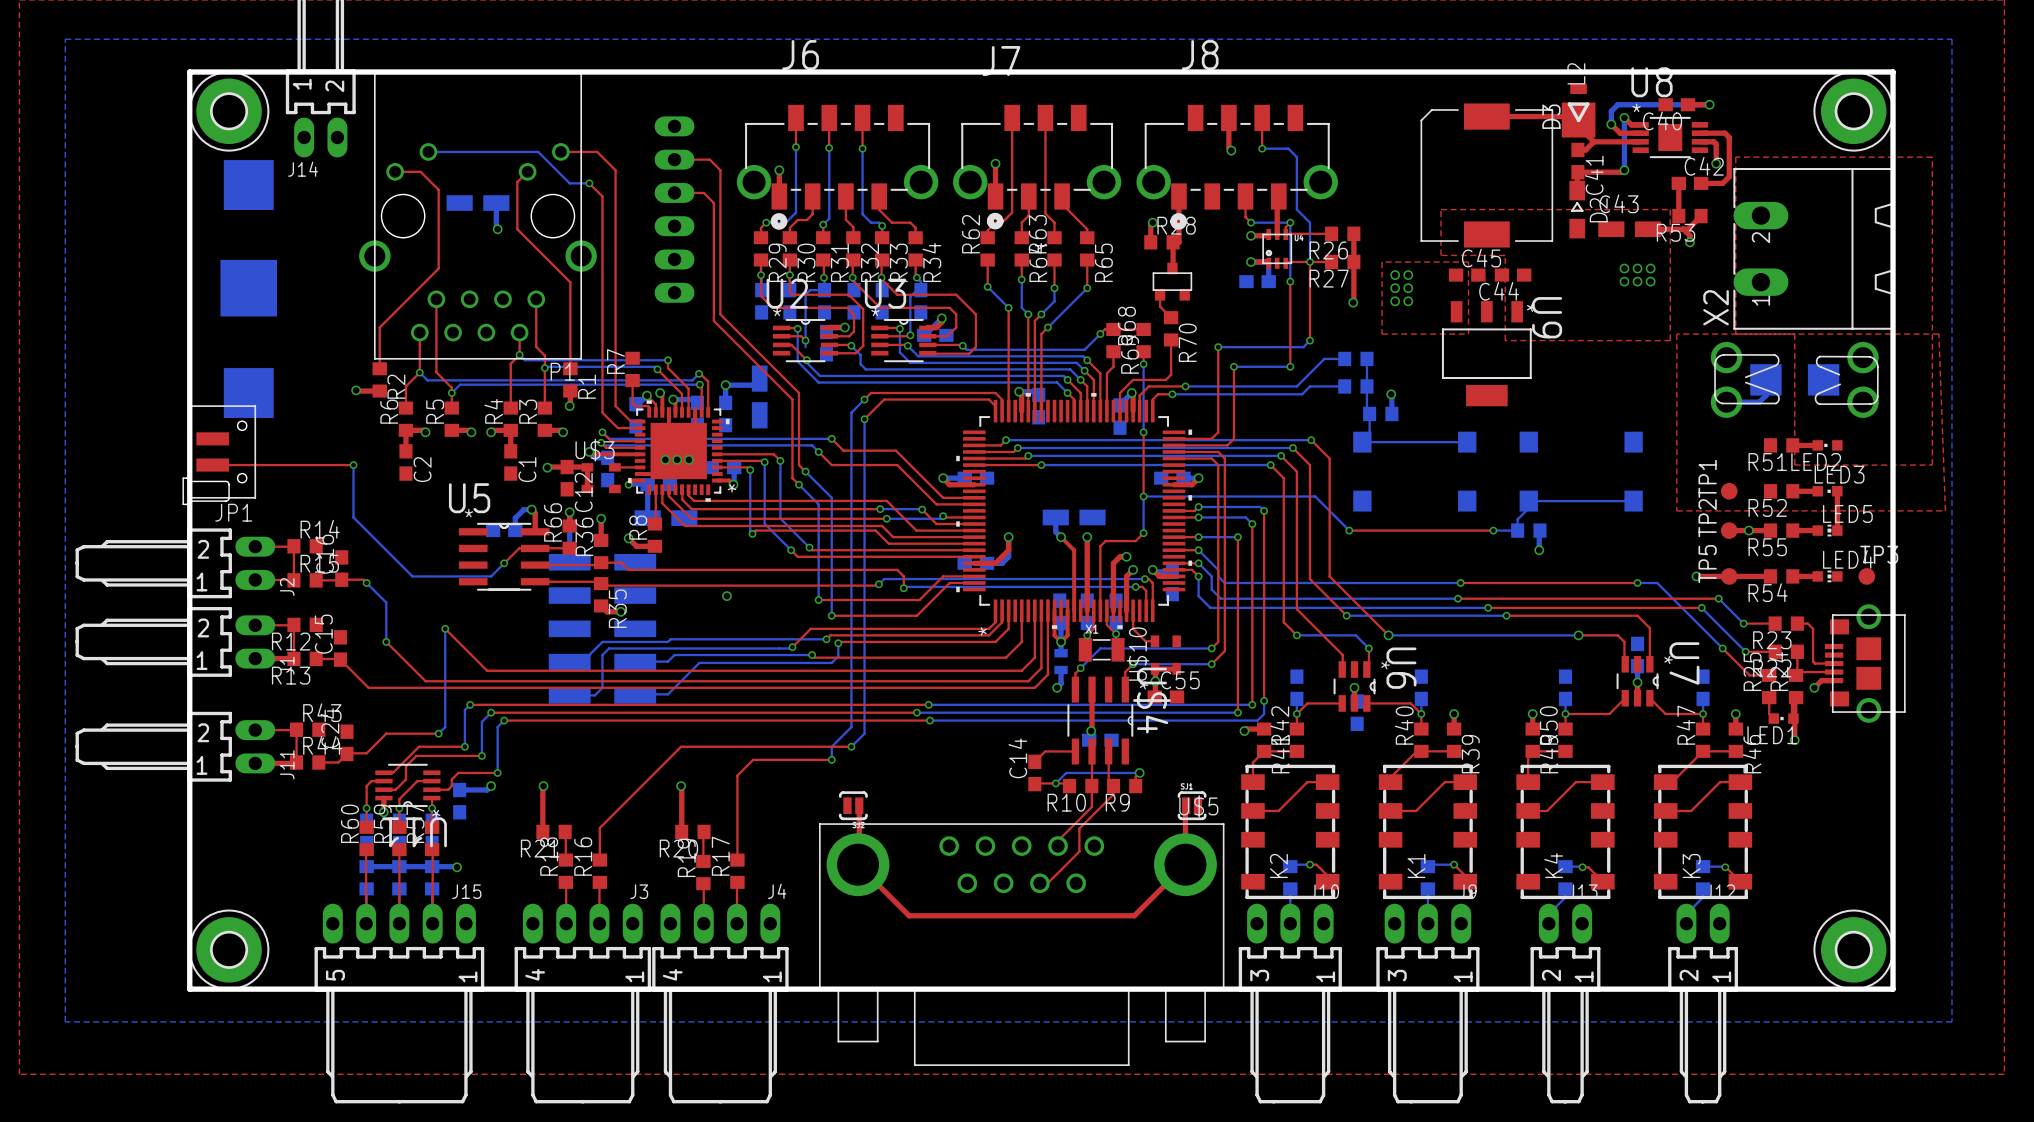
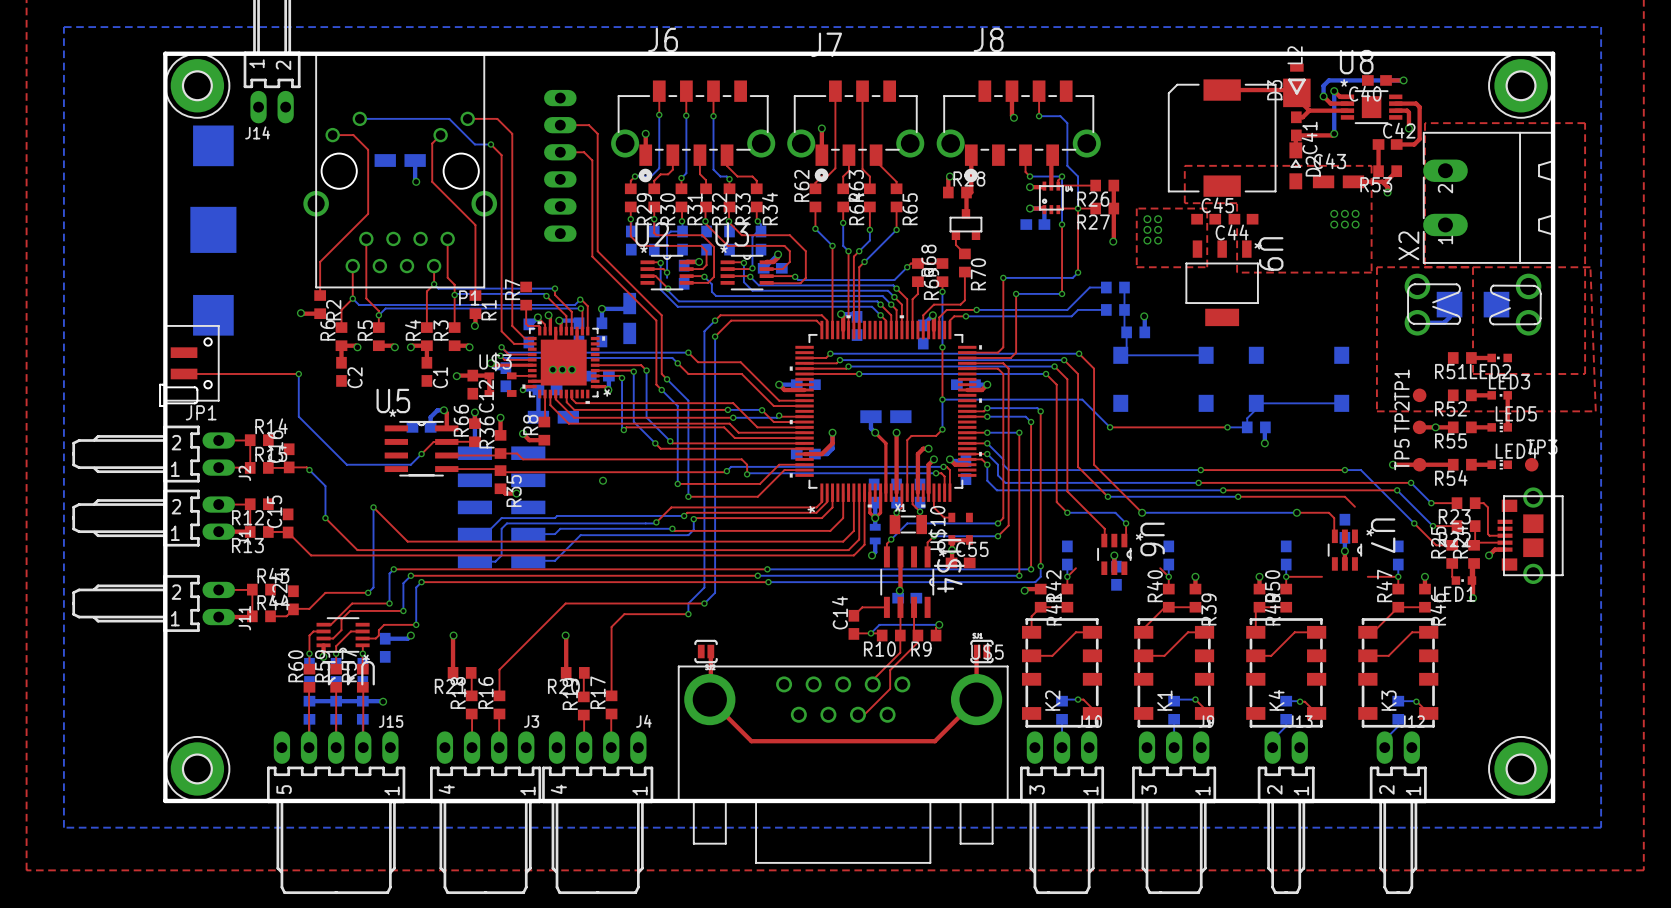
top track: (1649, 628) (1649, 664) -> none
top track: (1625, 698) (1609, 714) -> none
top track: (1649, 698) (1665, 714) -> none
top track: (1307, 703) (1342, 703) -> none
top track: (1366, 703) (1410, 703) -> none

